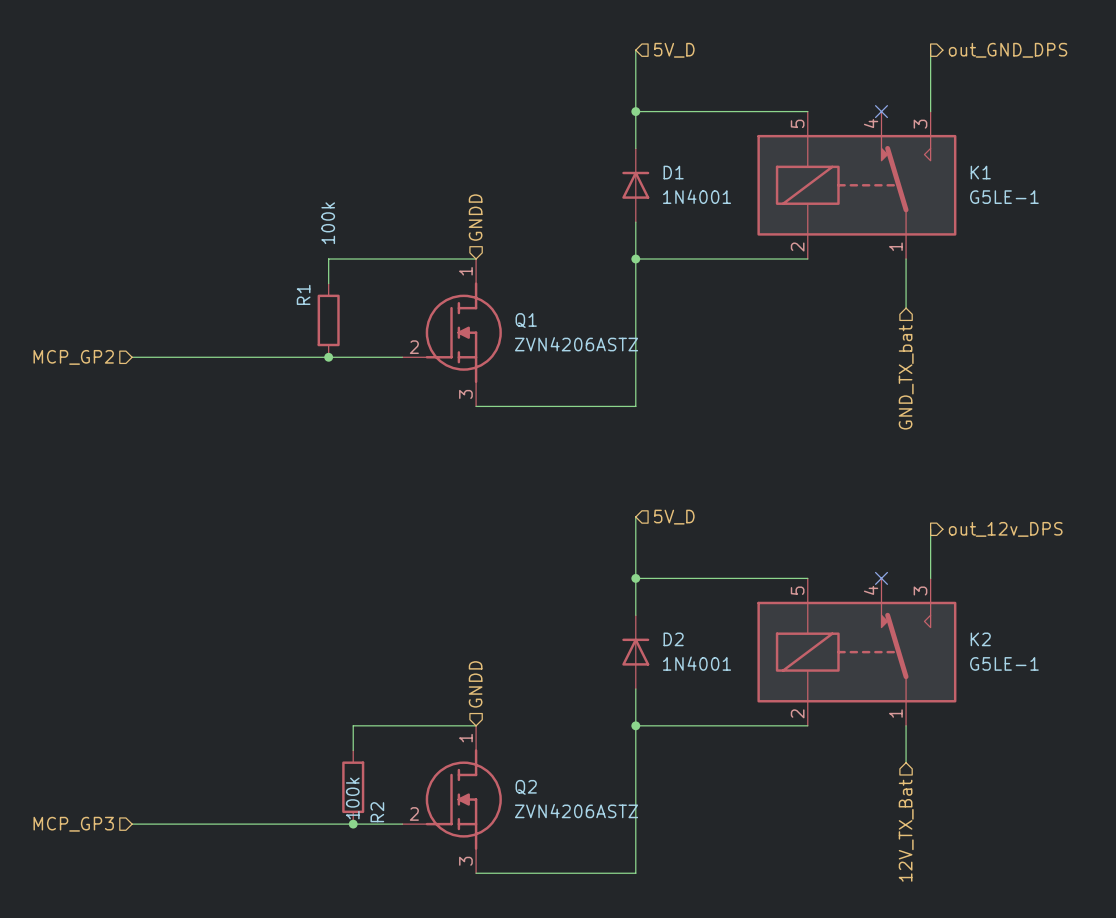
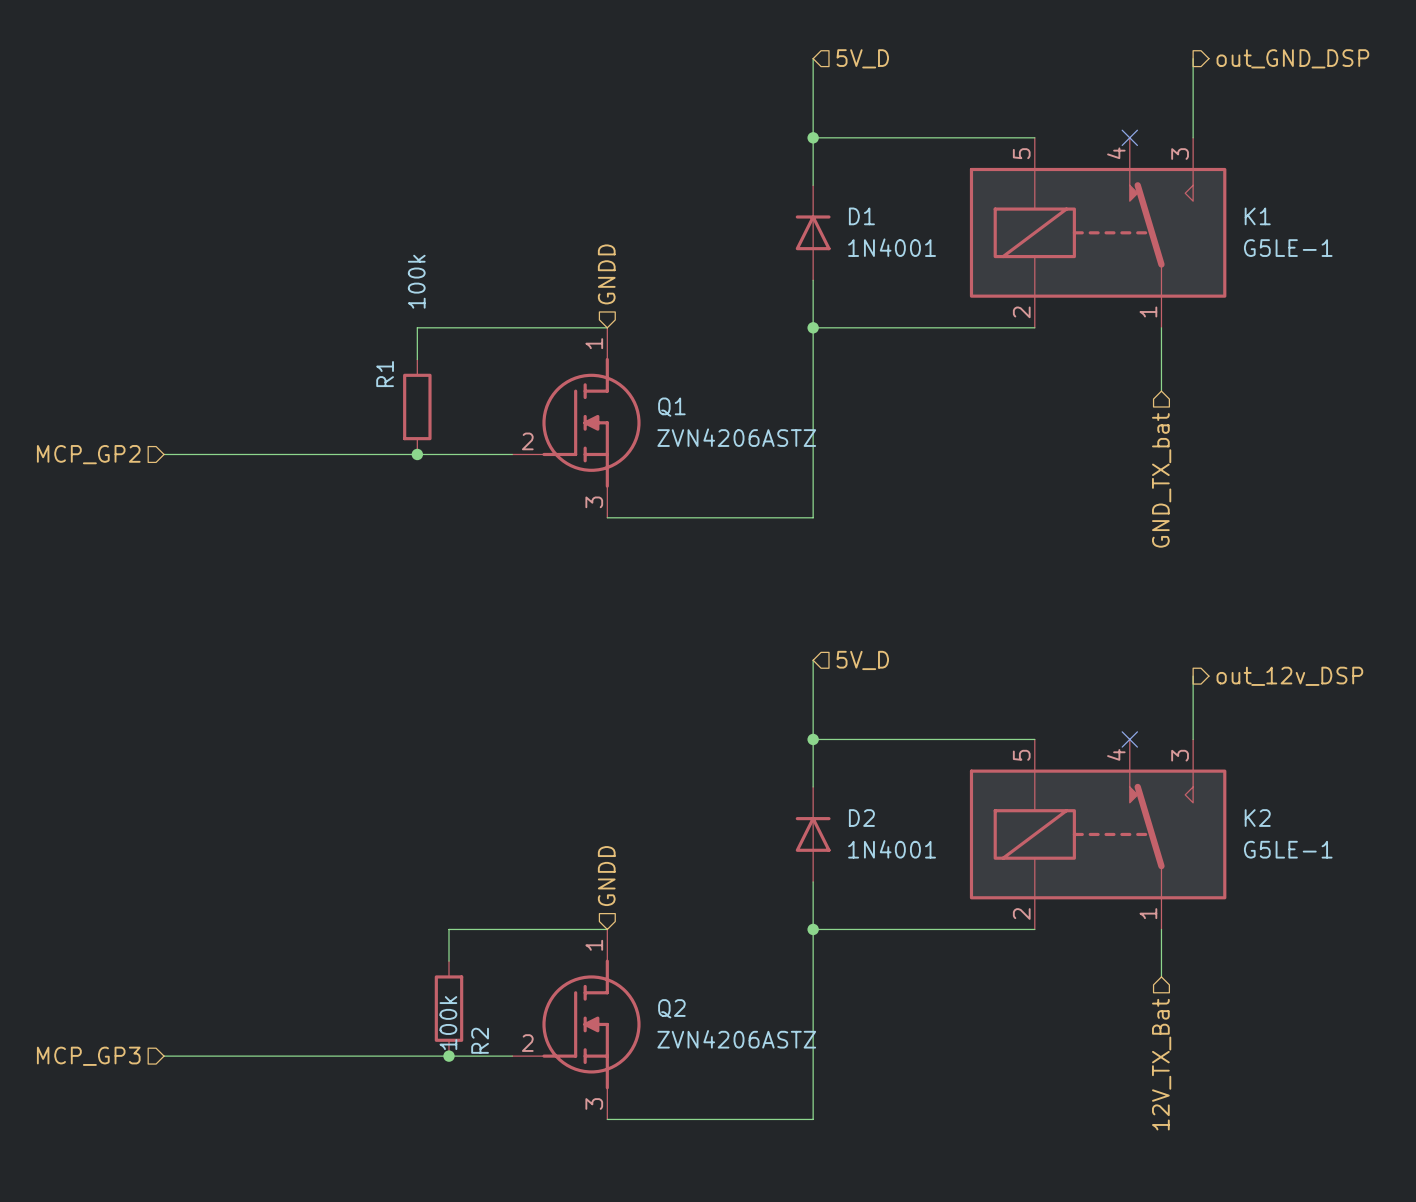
hierarchical label: out_GND_DPS (1008, 50) -> out_GND_DSP (1292, 58)
hierarchical label: out_12v_DPS (1005, 529) -> out_12v_DSP (1289, 676)

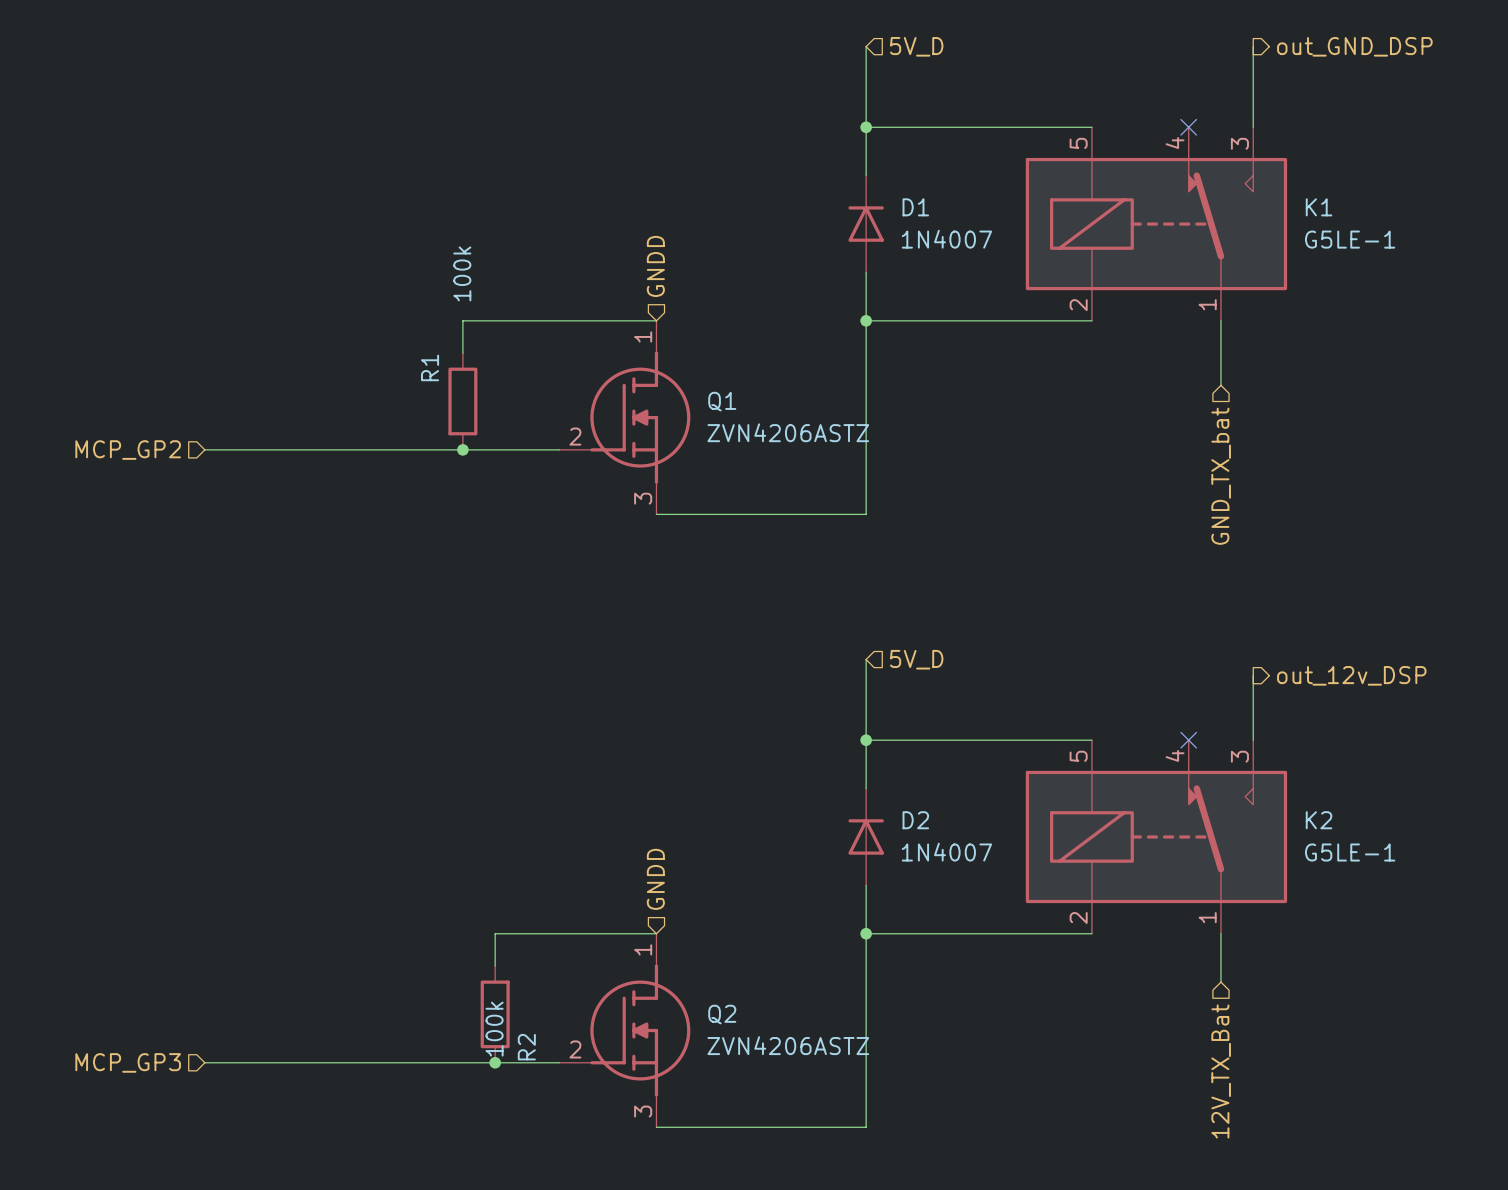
D1 value: 1N4001 (892, 247) -> 1N4007 (946, 239)
D2 value: 1N4001 (892, 849) -> 1N4007 (946, 852)

